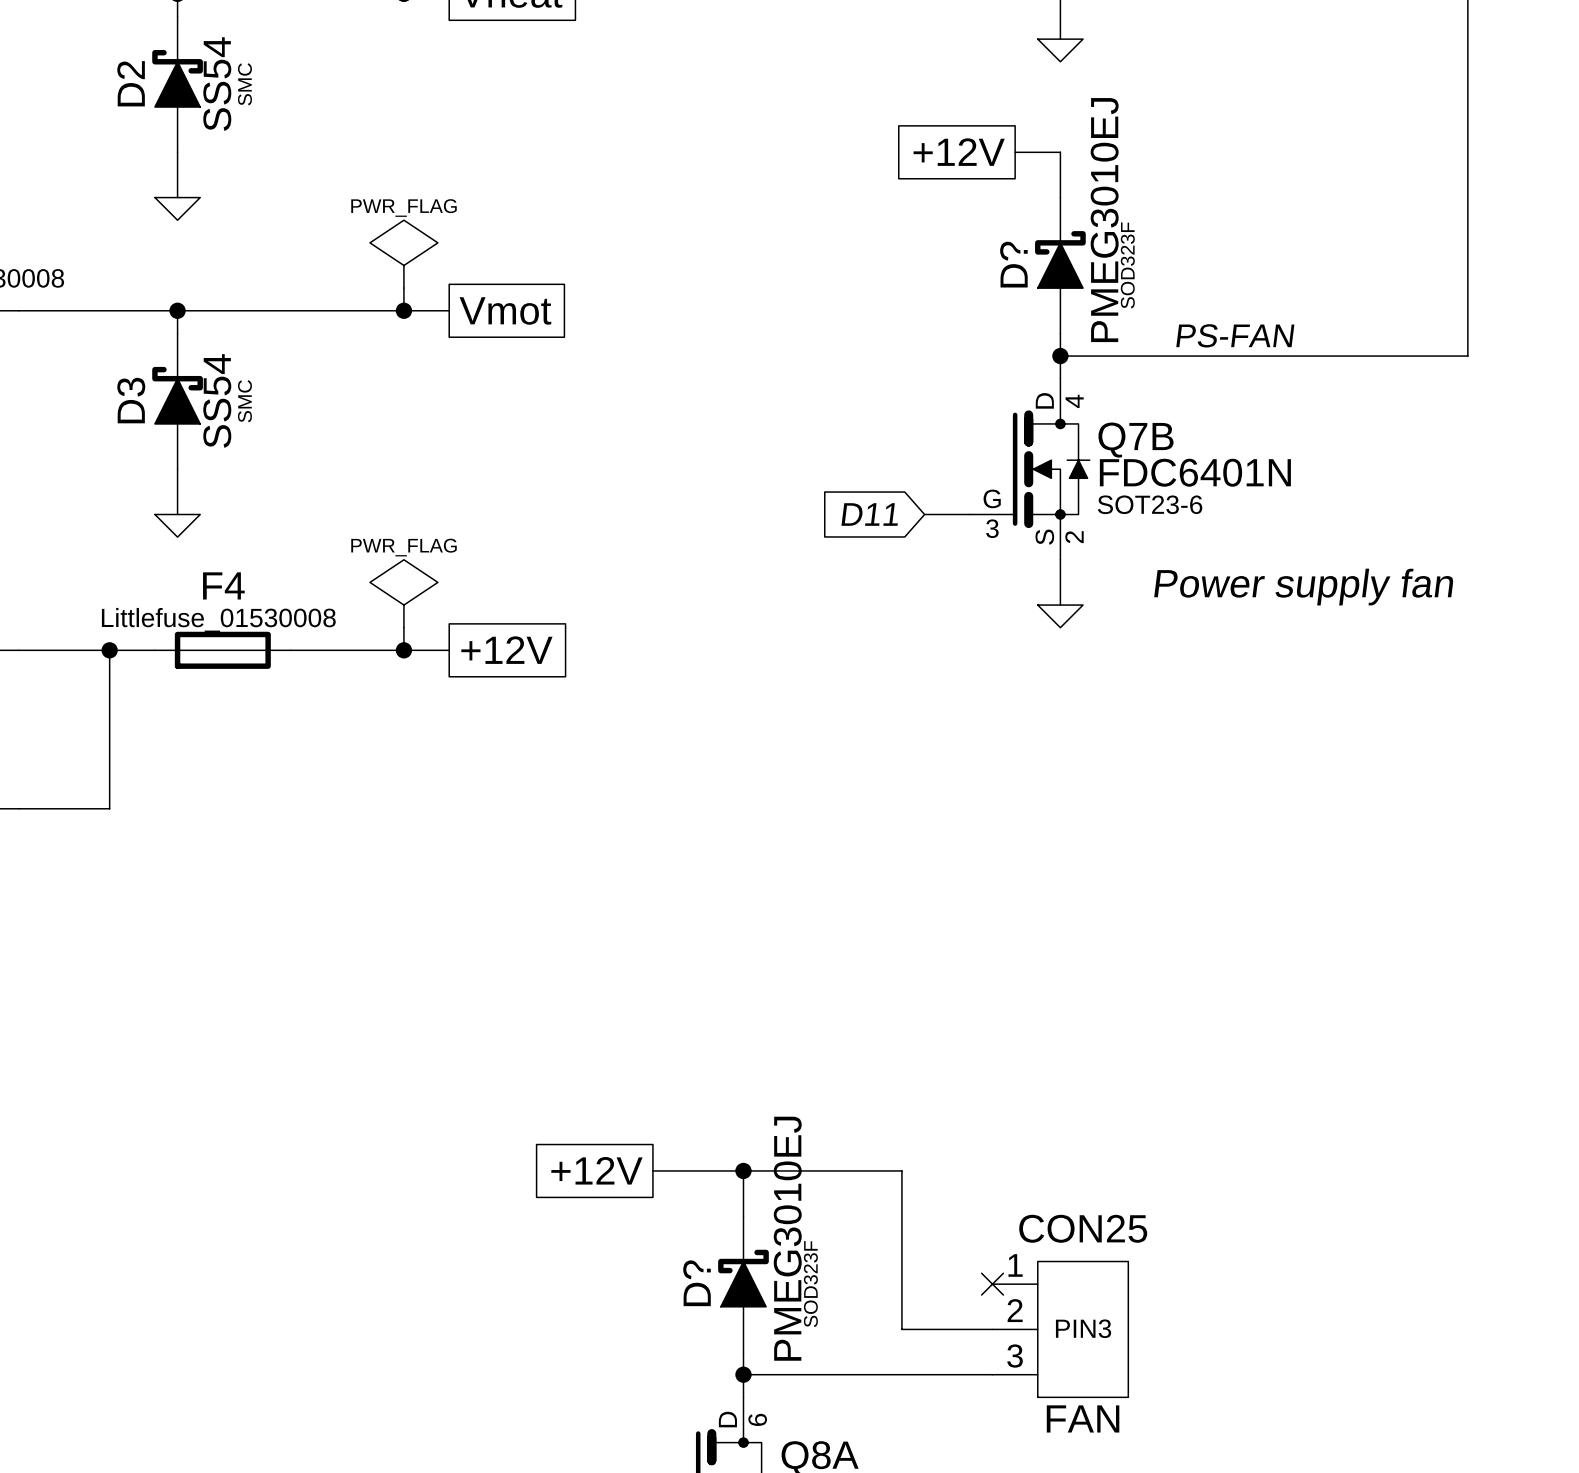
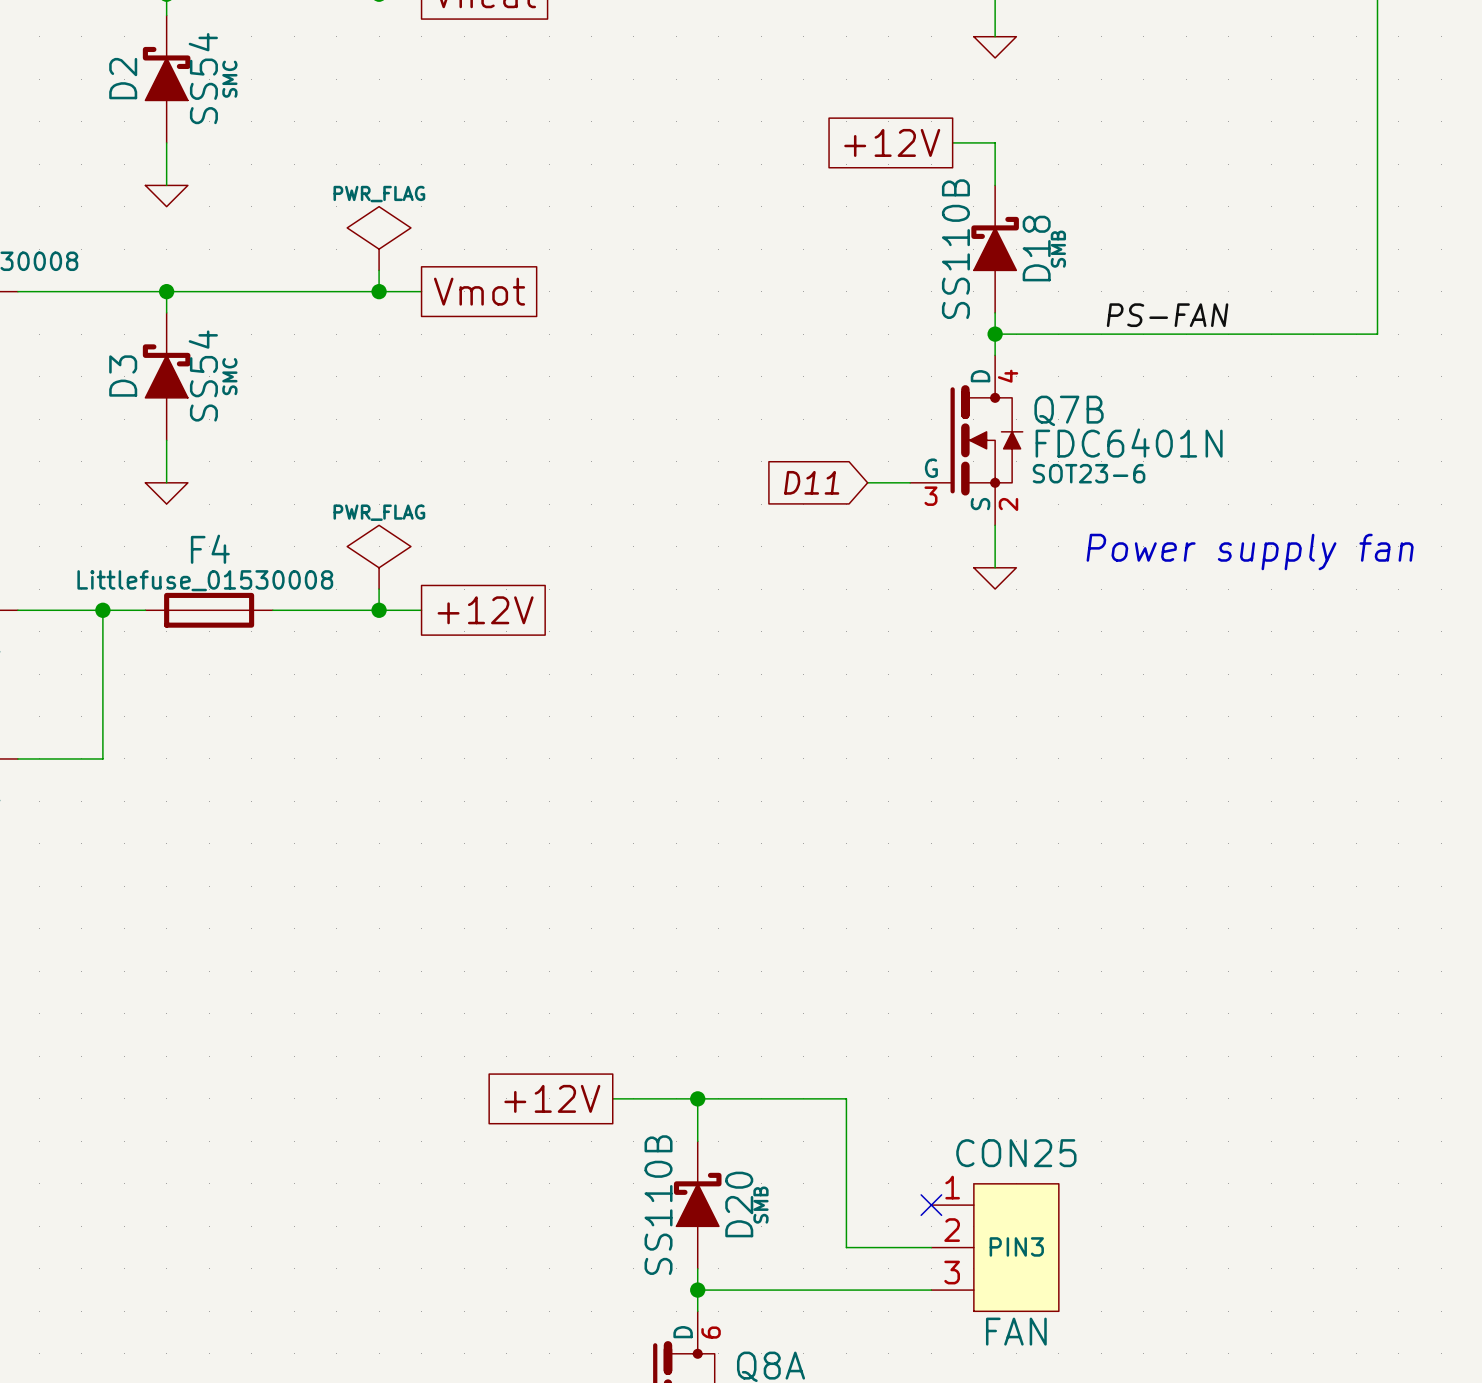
D? value: PMEG3010EJ (1104, 220) -> SS110B (955, 249)
D? name: D? (1013, 264) -> D18 (1036, 248)
D? text: SOD323F (1127, 265) -> SMB (1058, 249)
D? value: PMEG3010EJ (787, 1238) -> SS110B (658, 1205)
D? name: D? (696, 1283) -> D20 (739, 1204)
D? text: SOD323F (810, 1284) -> SMB (760, 1205)

